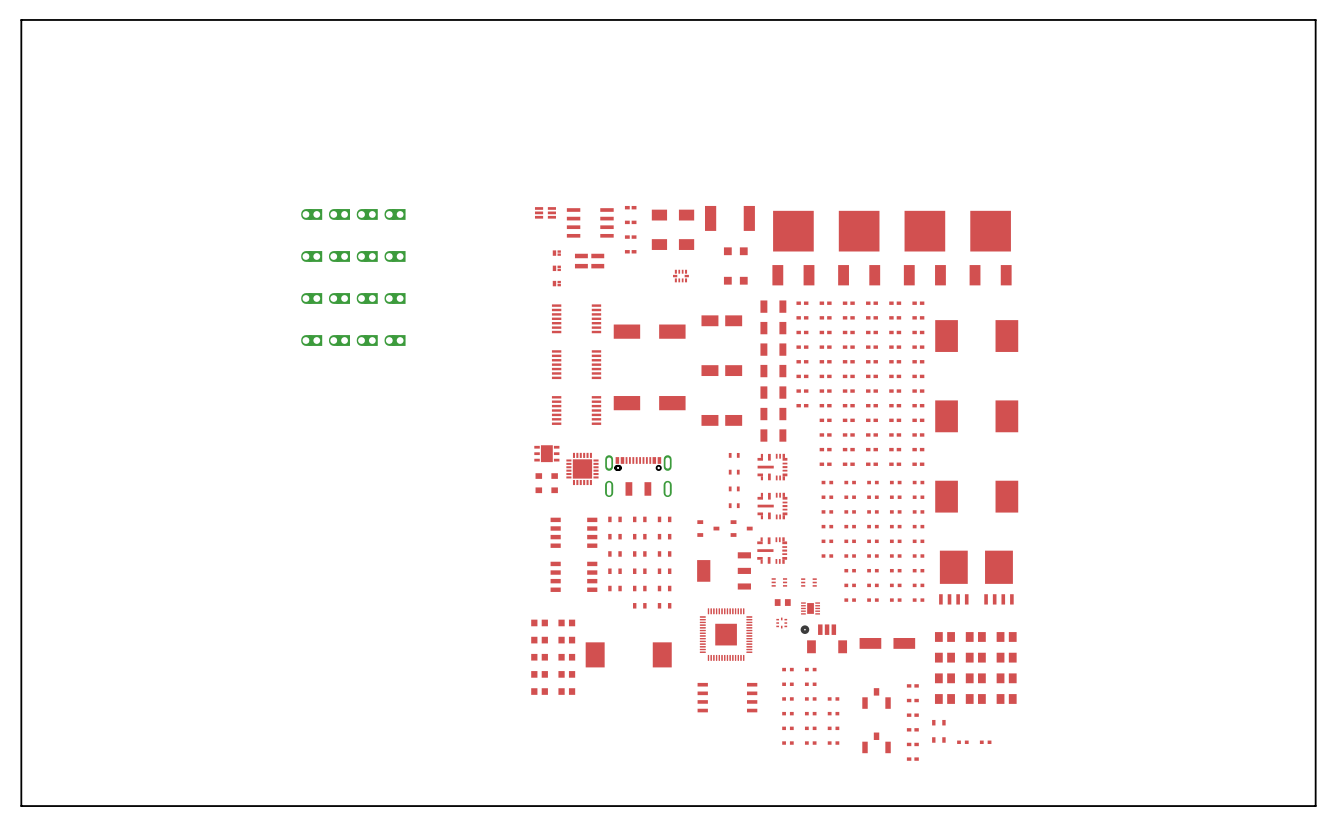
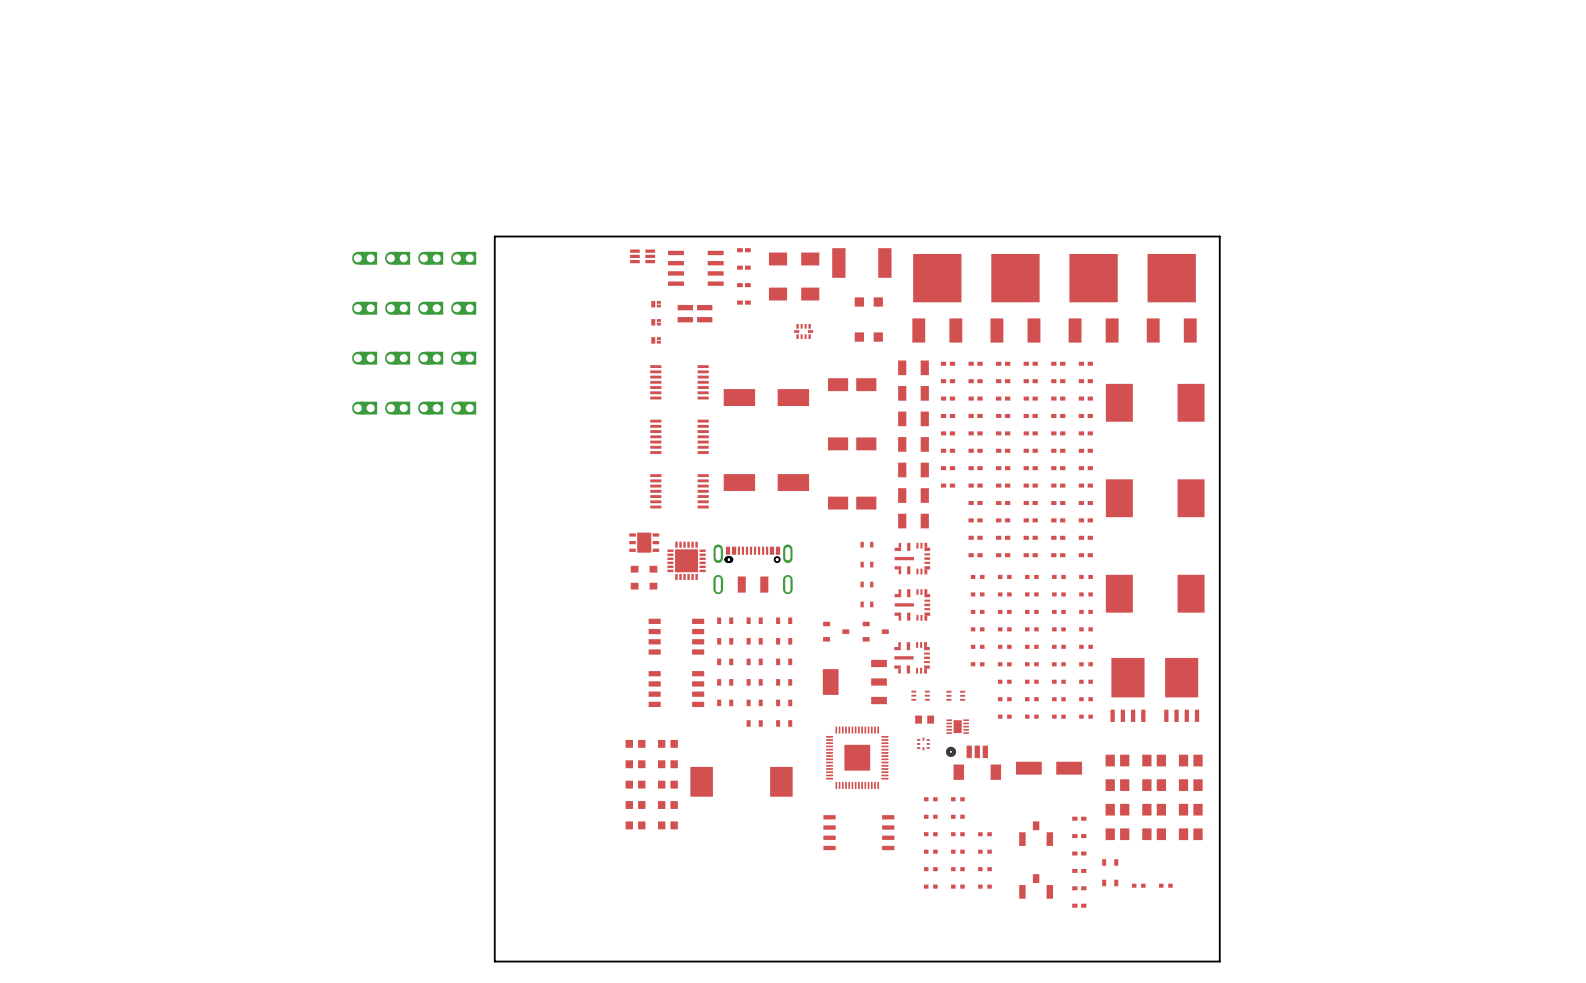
board edge: (1031, 806) (1315, 806) (1315, 19) (21, 19) (21, 806) (421, 806) -> (1219, 961) (1219, 236) (494, 236) (494, 961)

